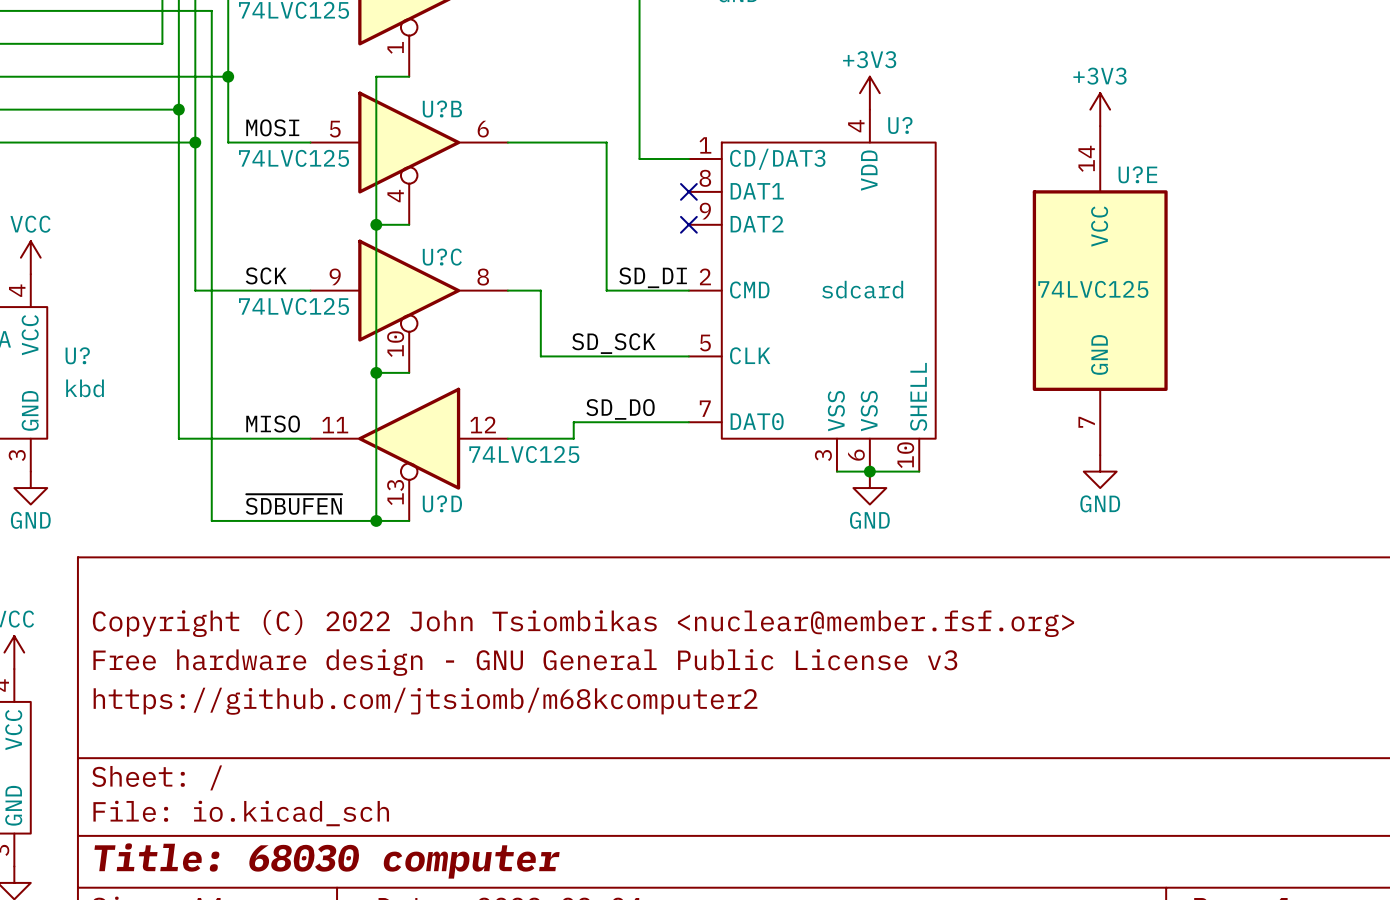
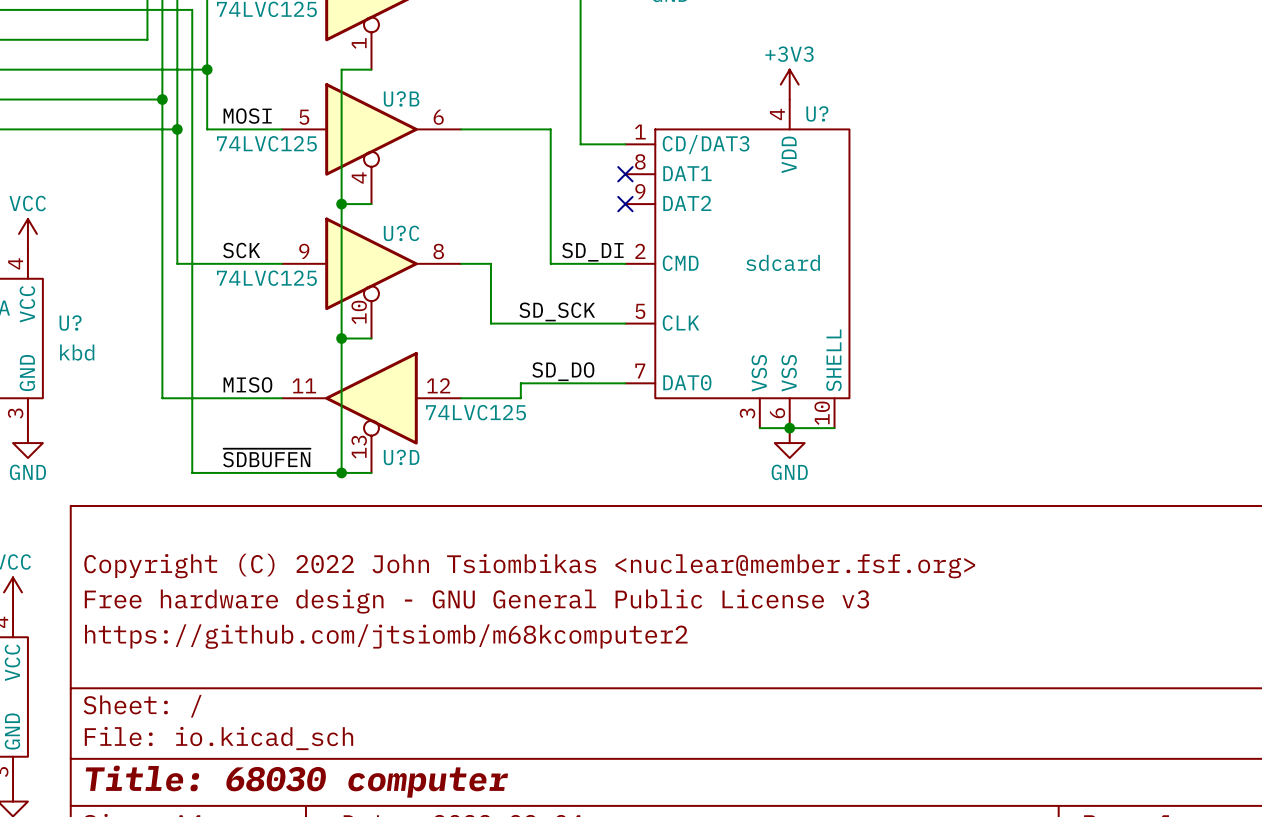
power symbol: +3V3 (1100, 109) -> none
U?E: 74LVC125 (1100, 290) -> none
power symbol: GND (1100, 471) -> none

